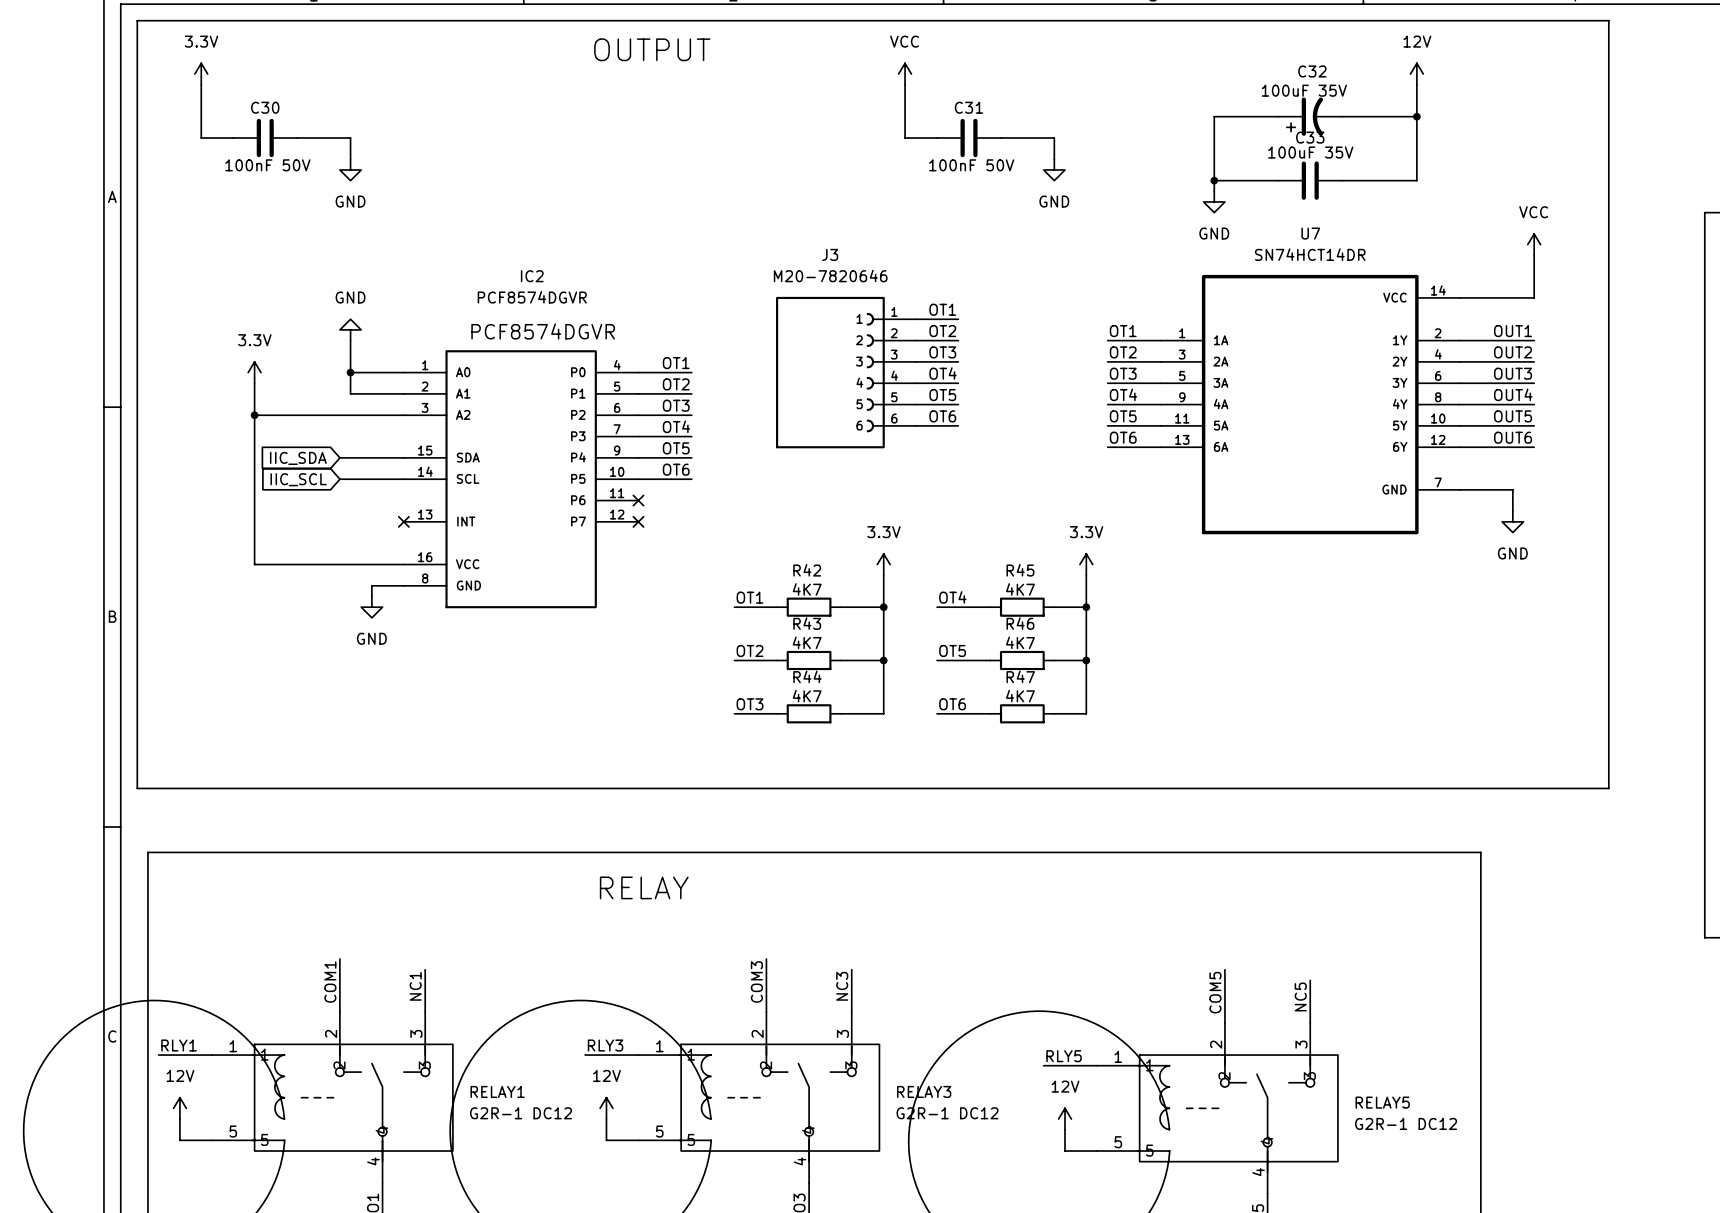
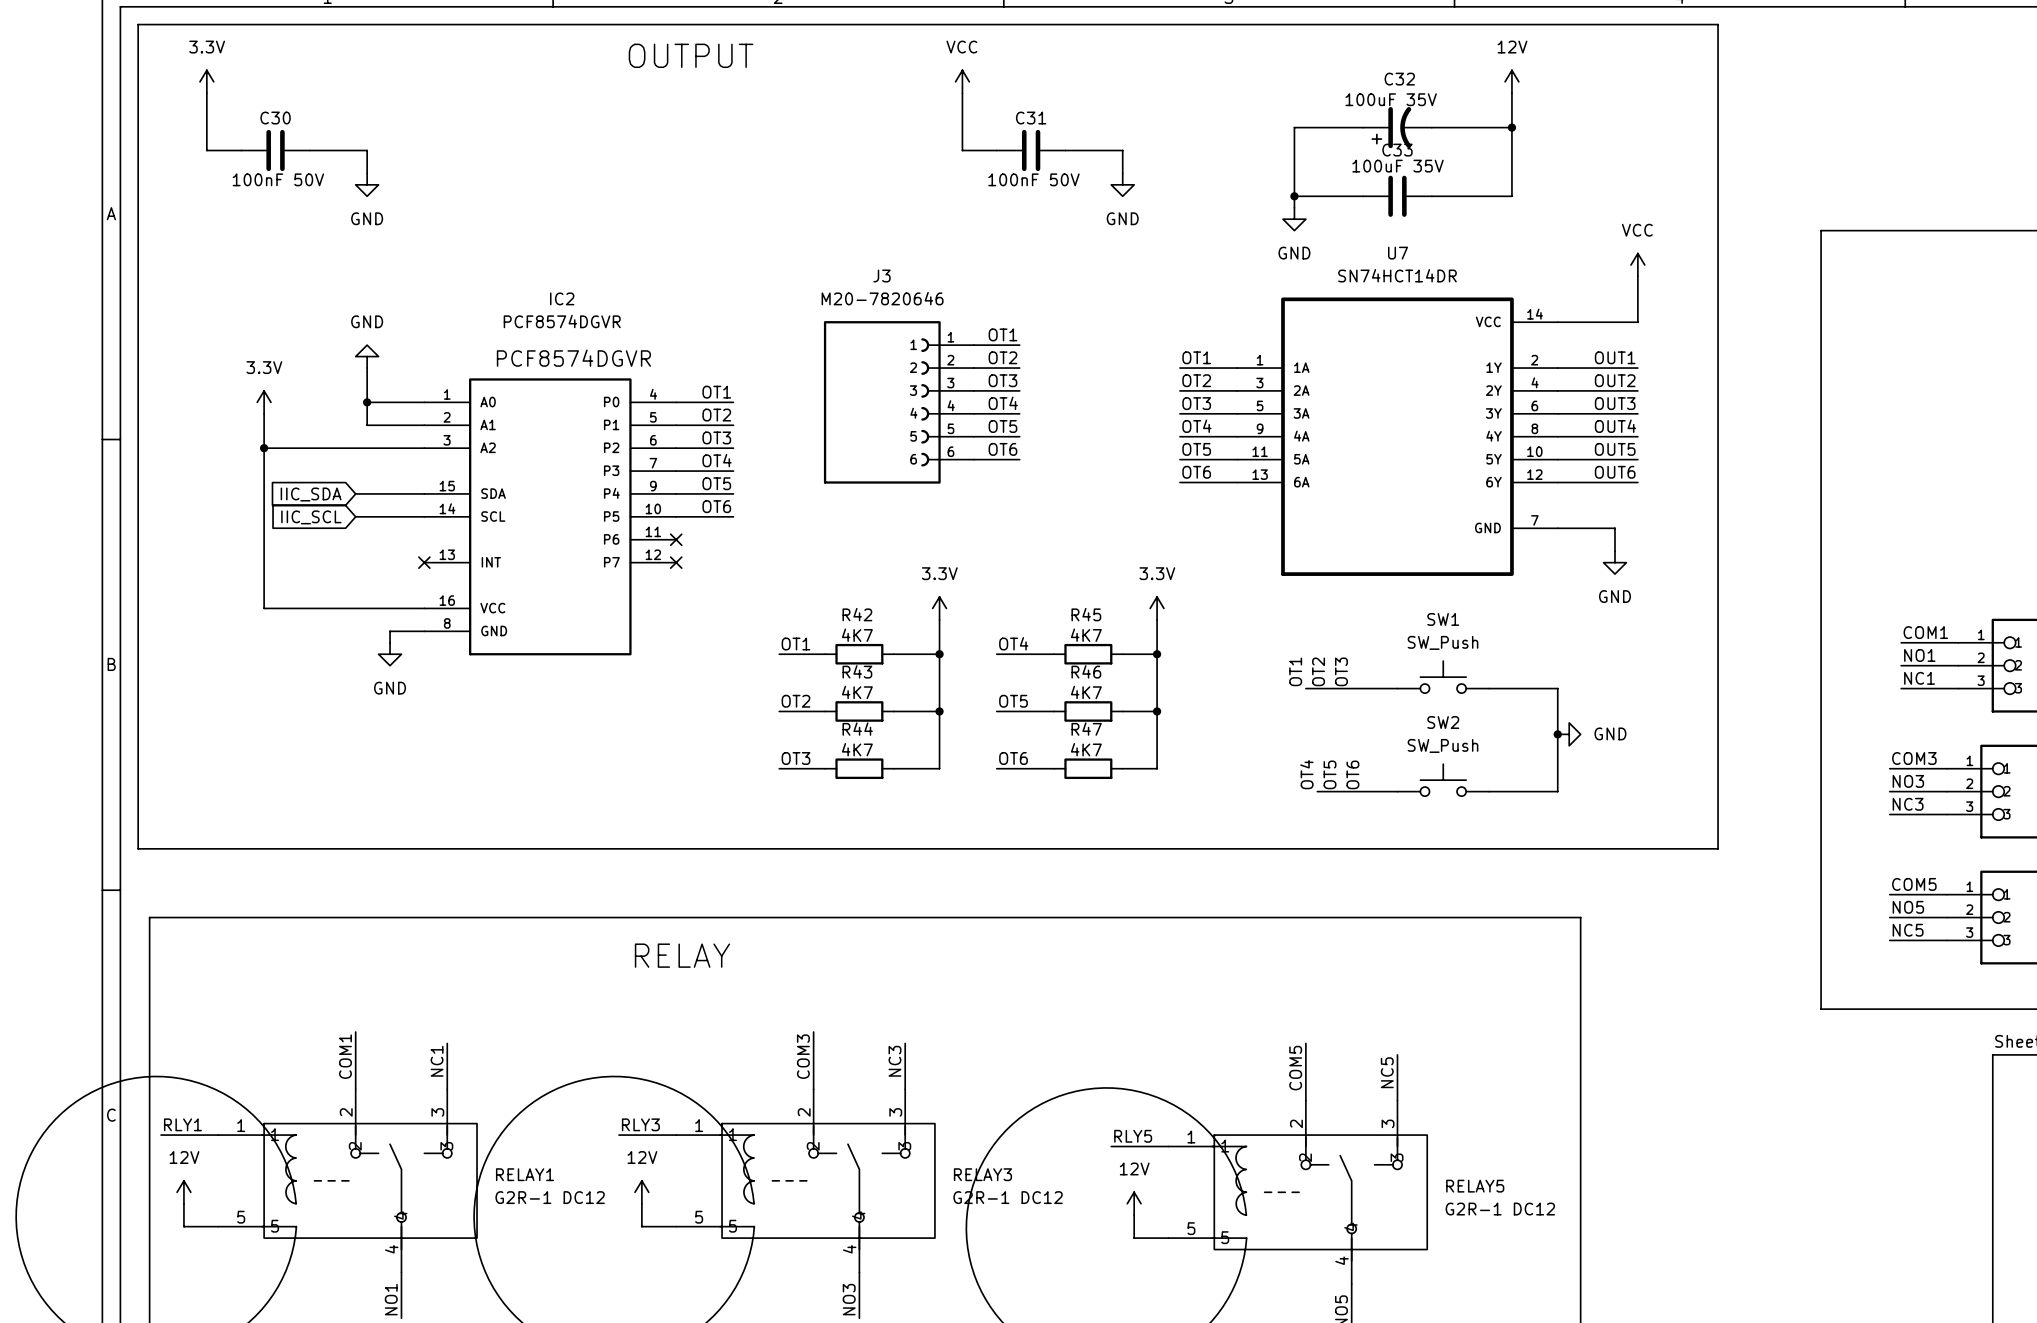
label: none -> OT1 (1295, 671)
label: none -> OT2 (1318, 671)
label: none -> OT3 (1341, 671)
SW1: none -> SW_Push (1443, 677)
wire: none -> (1305, 688) (1397, 688)
wire: none -> (1489, 688) (1557, 688) (1557, 791) (1489, 791)
junction: none -> (1557, 734)
power symbol: none -> GND (1569, 734)
label: none -> OT4 (1306, 774)
label: none -> OT5 (1330, 774)
label: none -> OT6 (1352, 774)
SW2: none -> SW_Push (1443, 780)
wire: none -> (1317, 791) (1397, 791)

